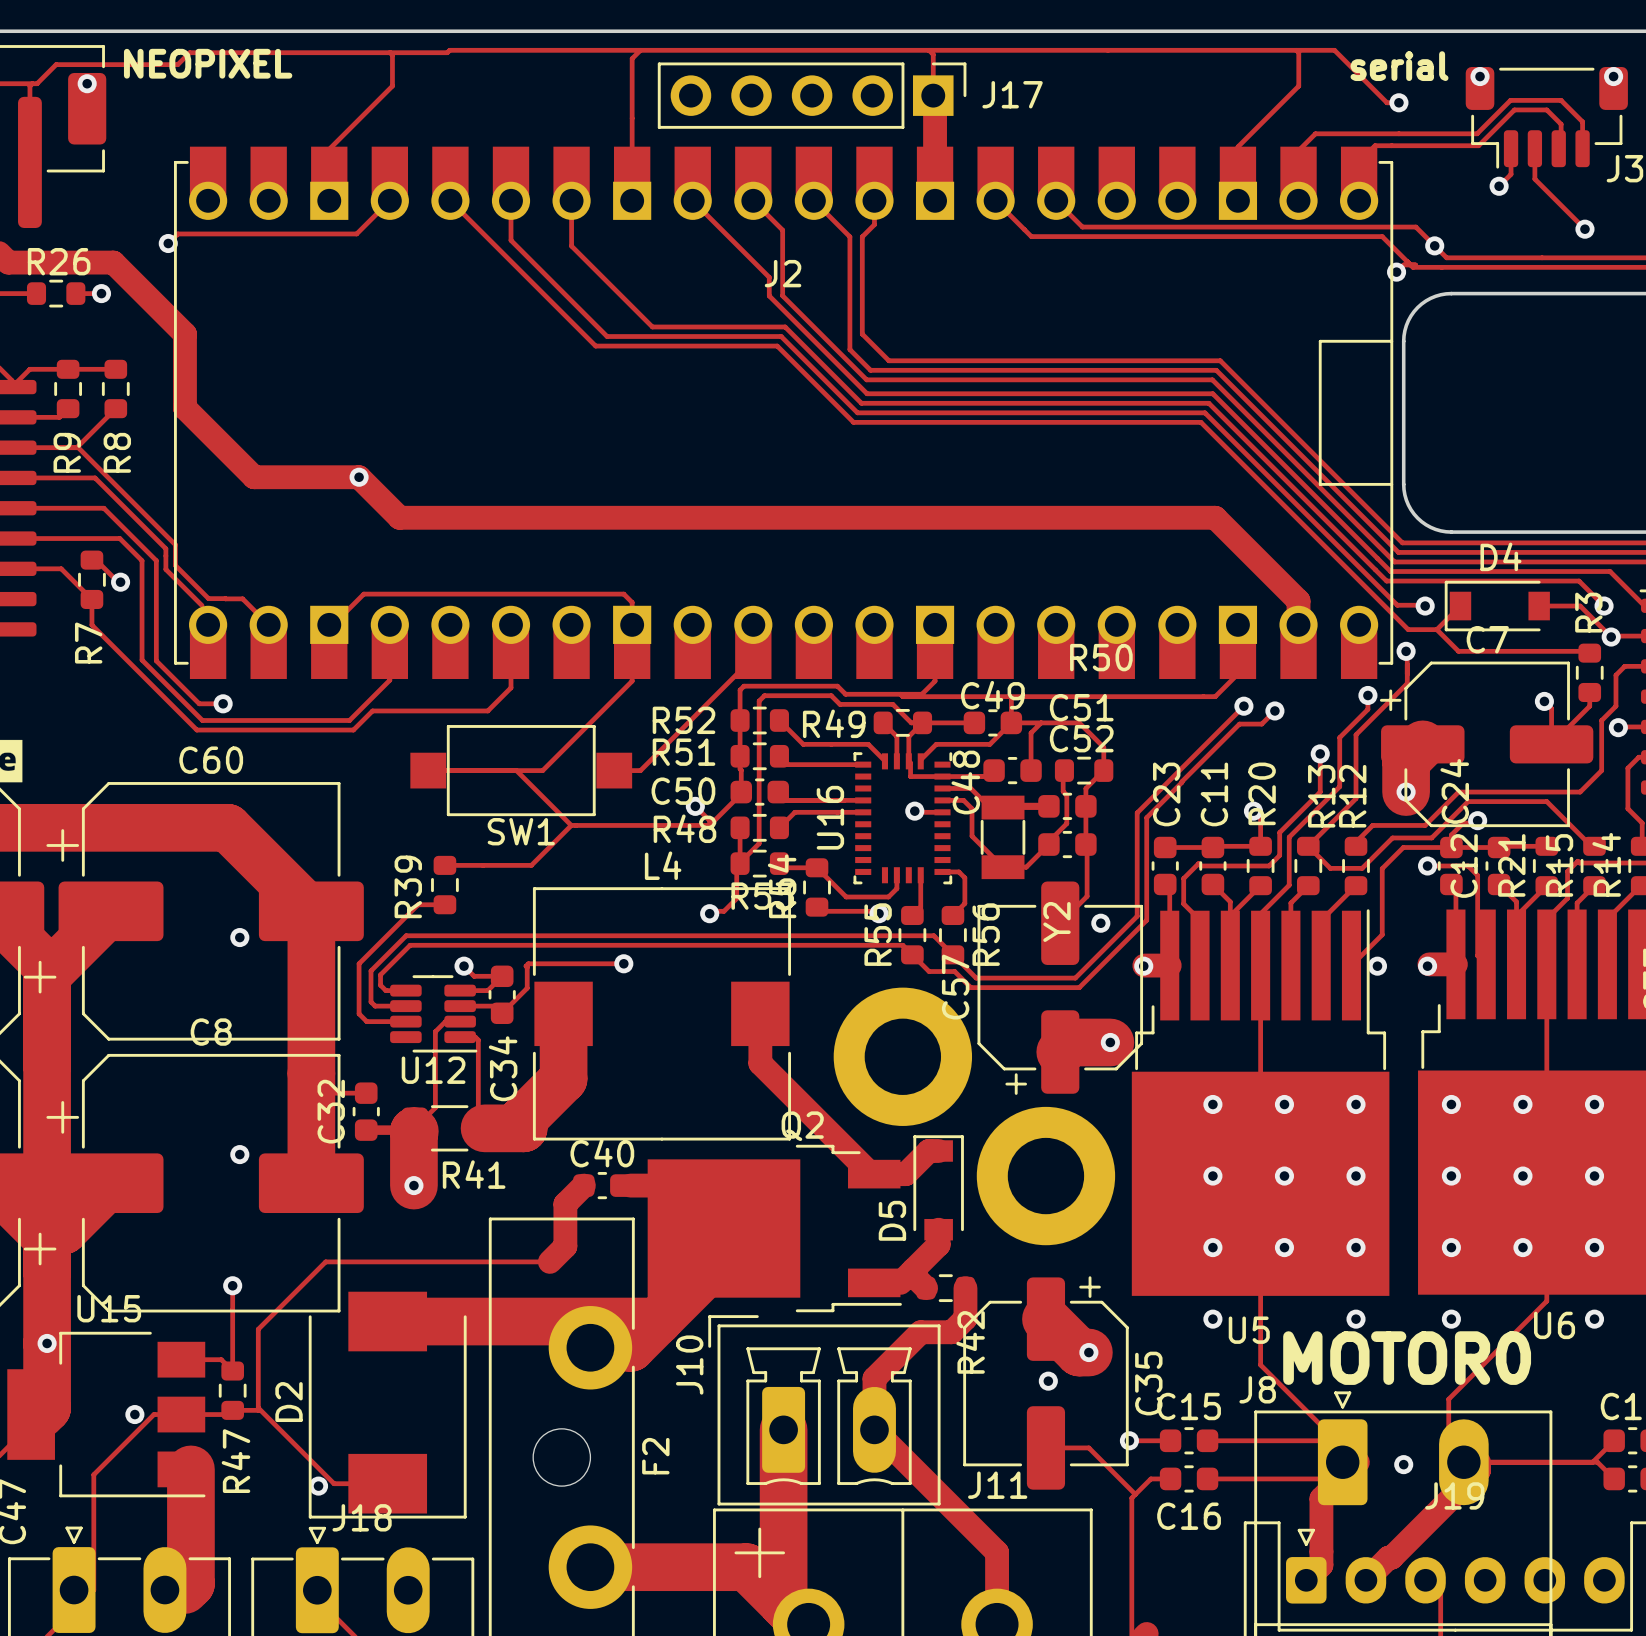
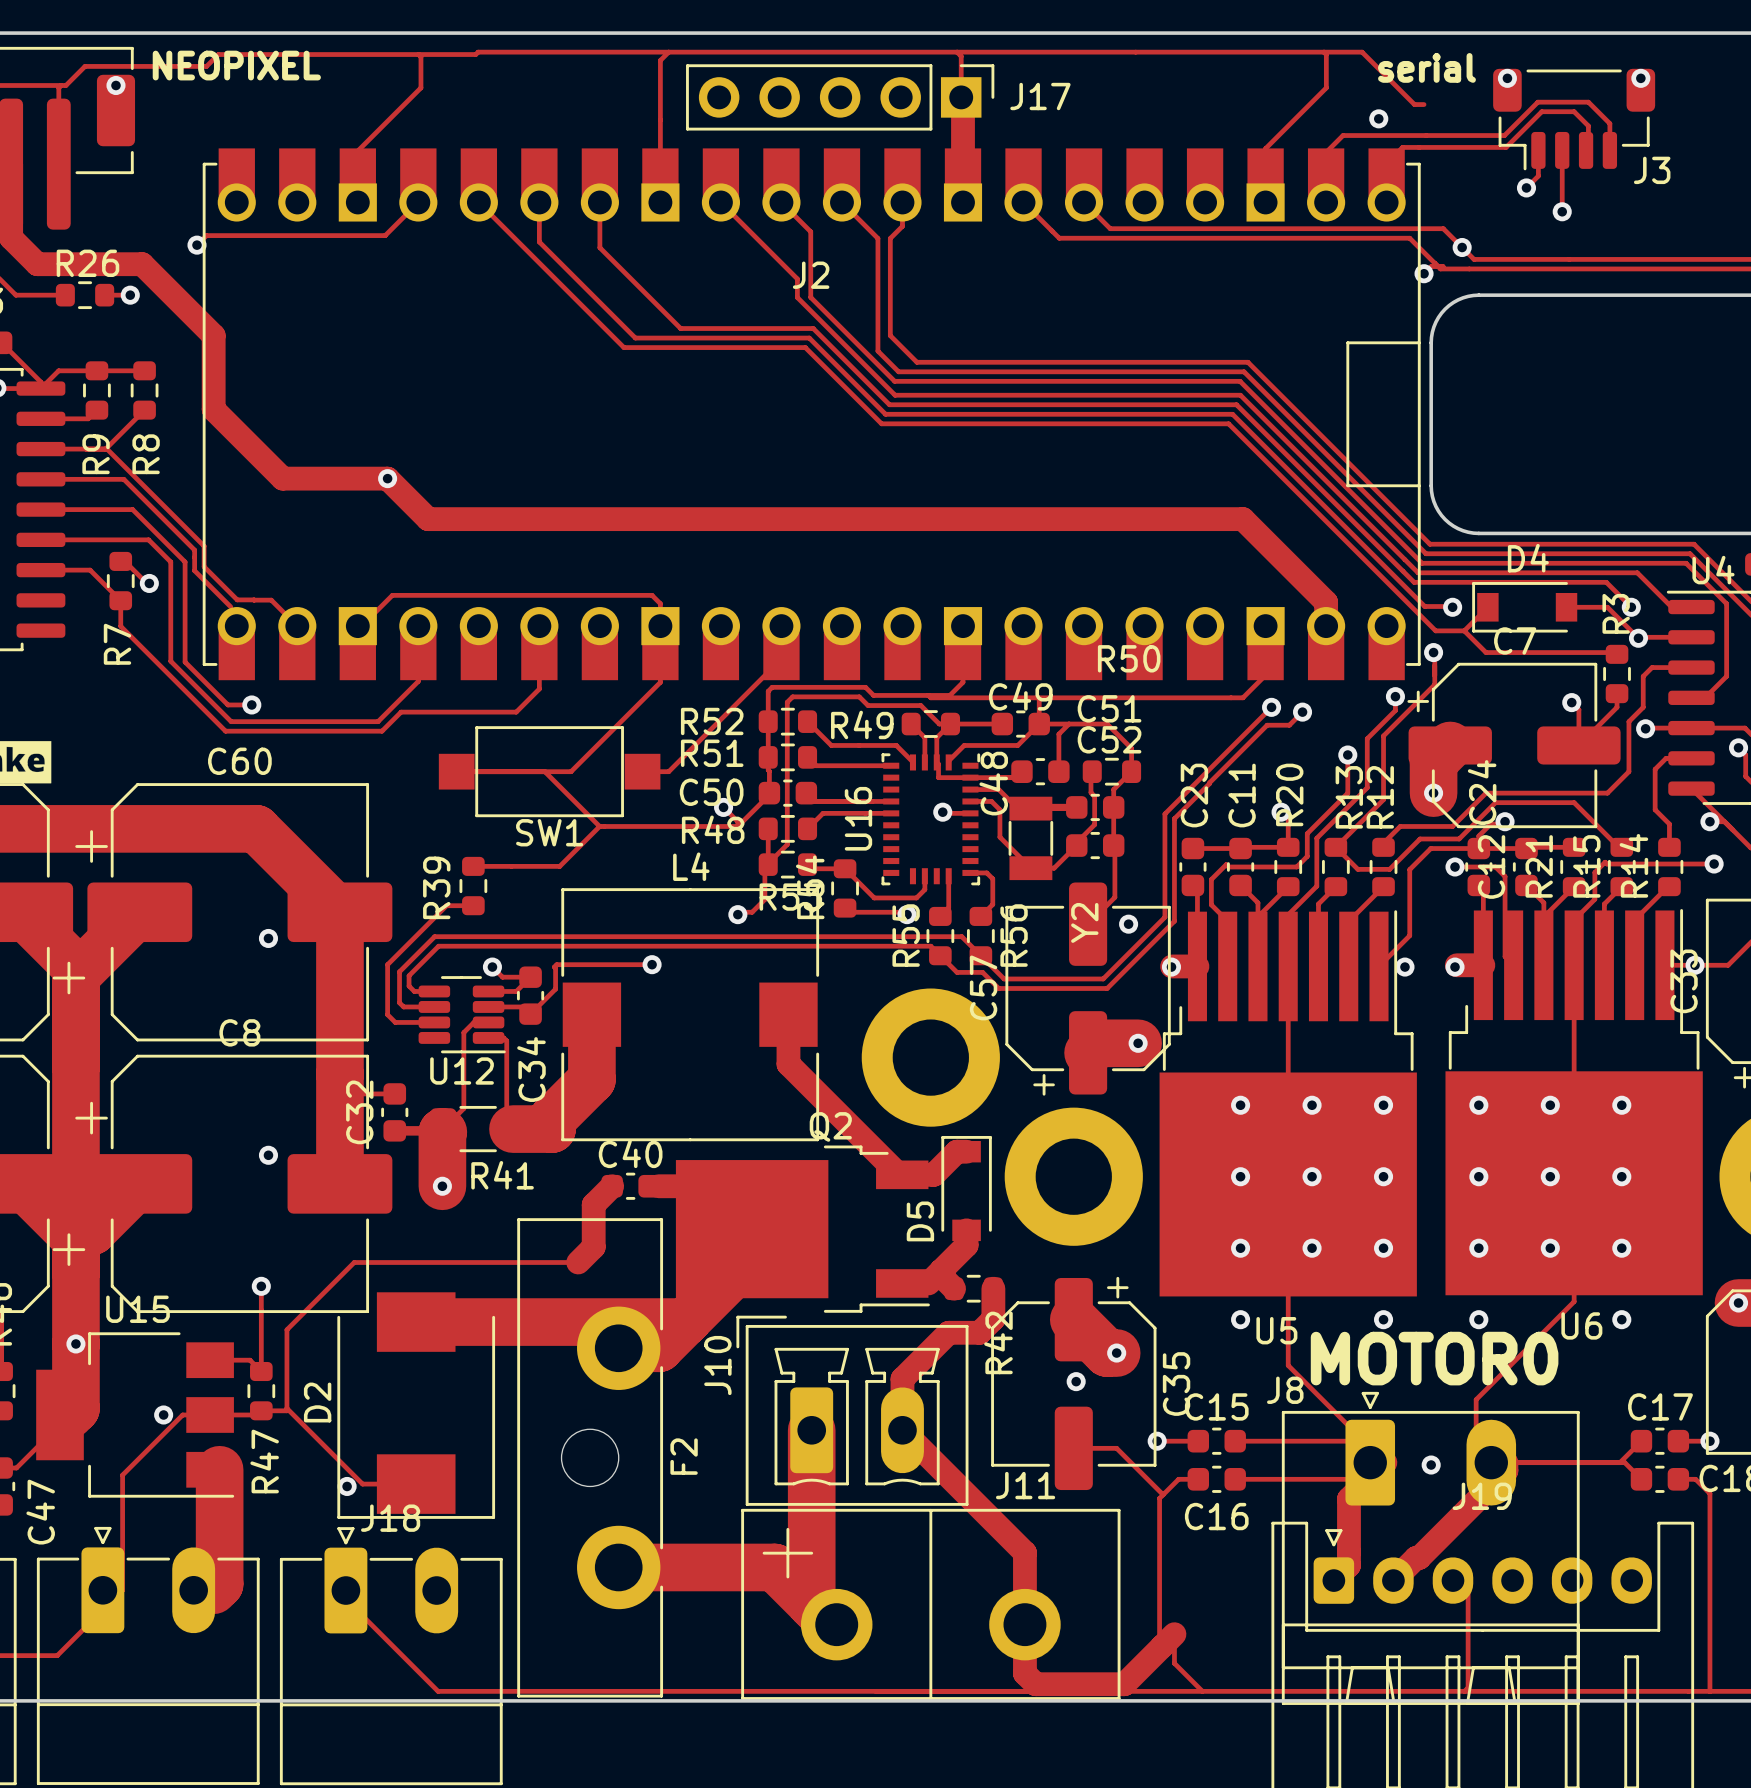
via position: (1398, 102) -> (1378, 118)
track: (1534, 179) (1584, 229) -> (1562, 180) (1562, 211)
via position: (1584, 229) -> (1562, 211)

